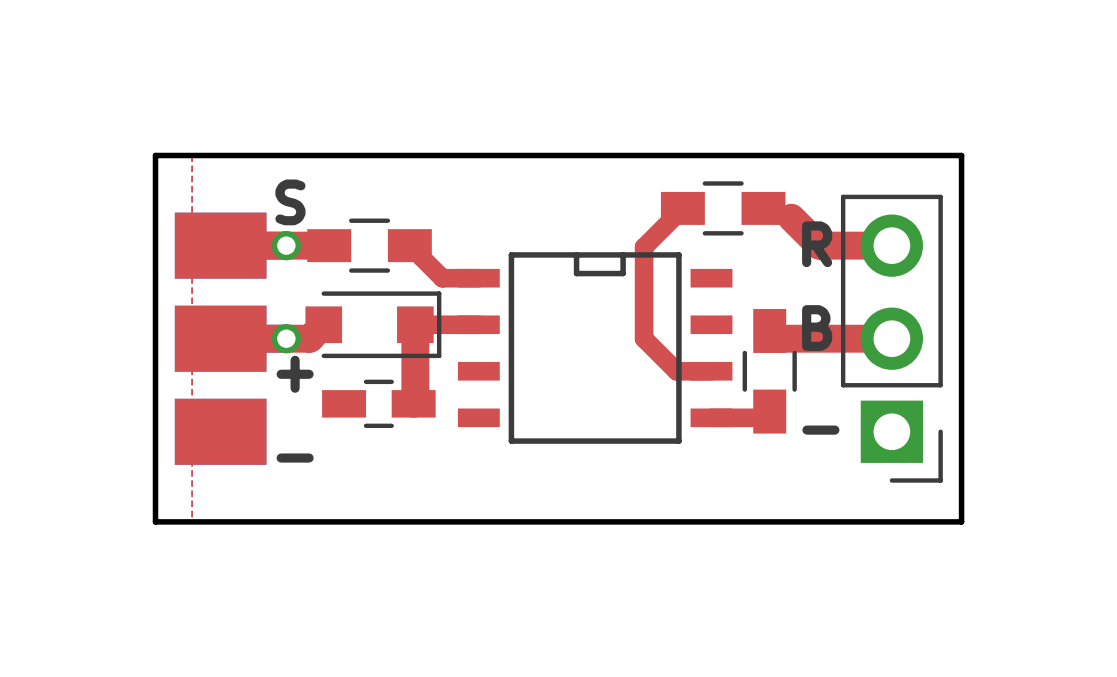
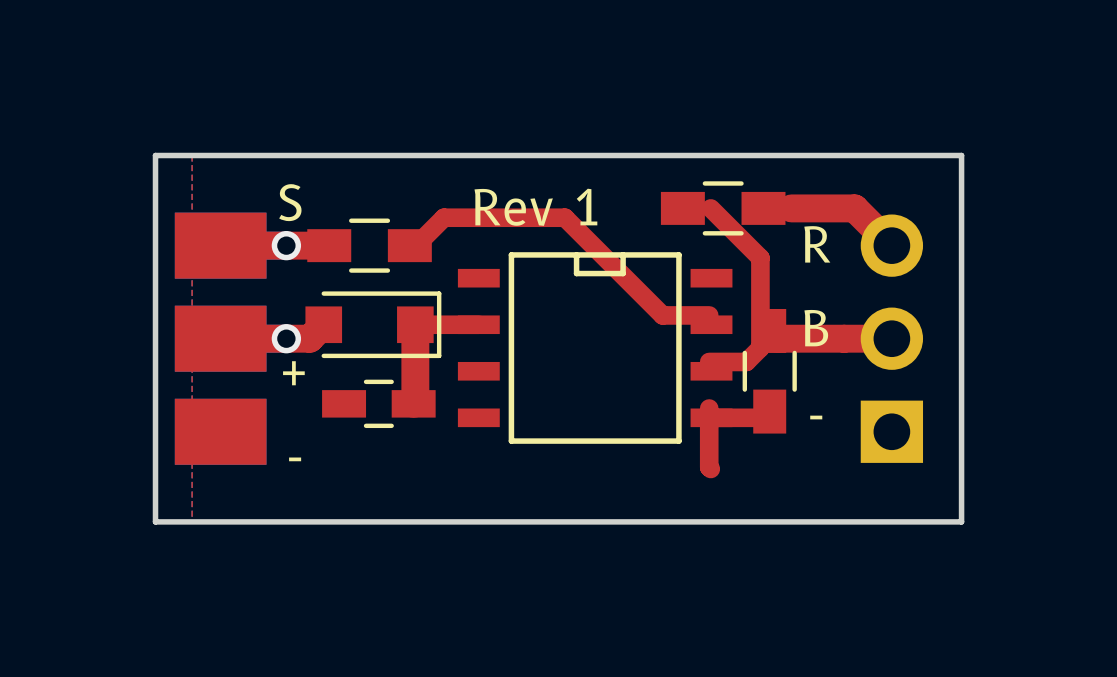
part footprint: [840, 194, 943, 483] -> [860, 214, 924, 463]
text: none -> Rev 1 (535, 207)
top track: (682, 208) (644, 247) (644, 338) (676, 371) (711, 371) -> none
top track: none -> (710, 208) (760, 258) (760, 348) (746, 361) (709, 361)
top track: (791, 217) (819, 245) (891, 245) -> (791, 208) (854, 208) (891, 245)
top track: (409, 245) (442, 278) (478, 278) -> (409, 245) (416, 245) (444, 217) (564, 217) (662, 315) (709, 315)
top track: none -> (709, 408) (709, 467) (710, 468)
text position: - (820, 430) -> - (816, 417)

